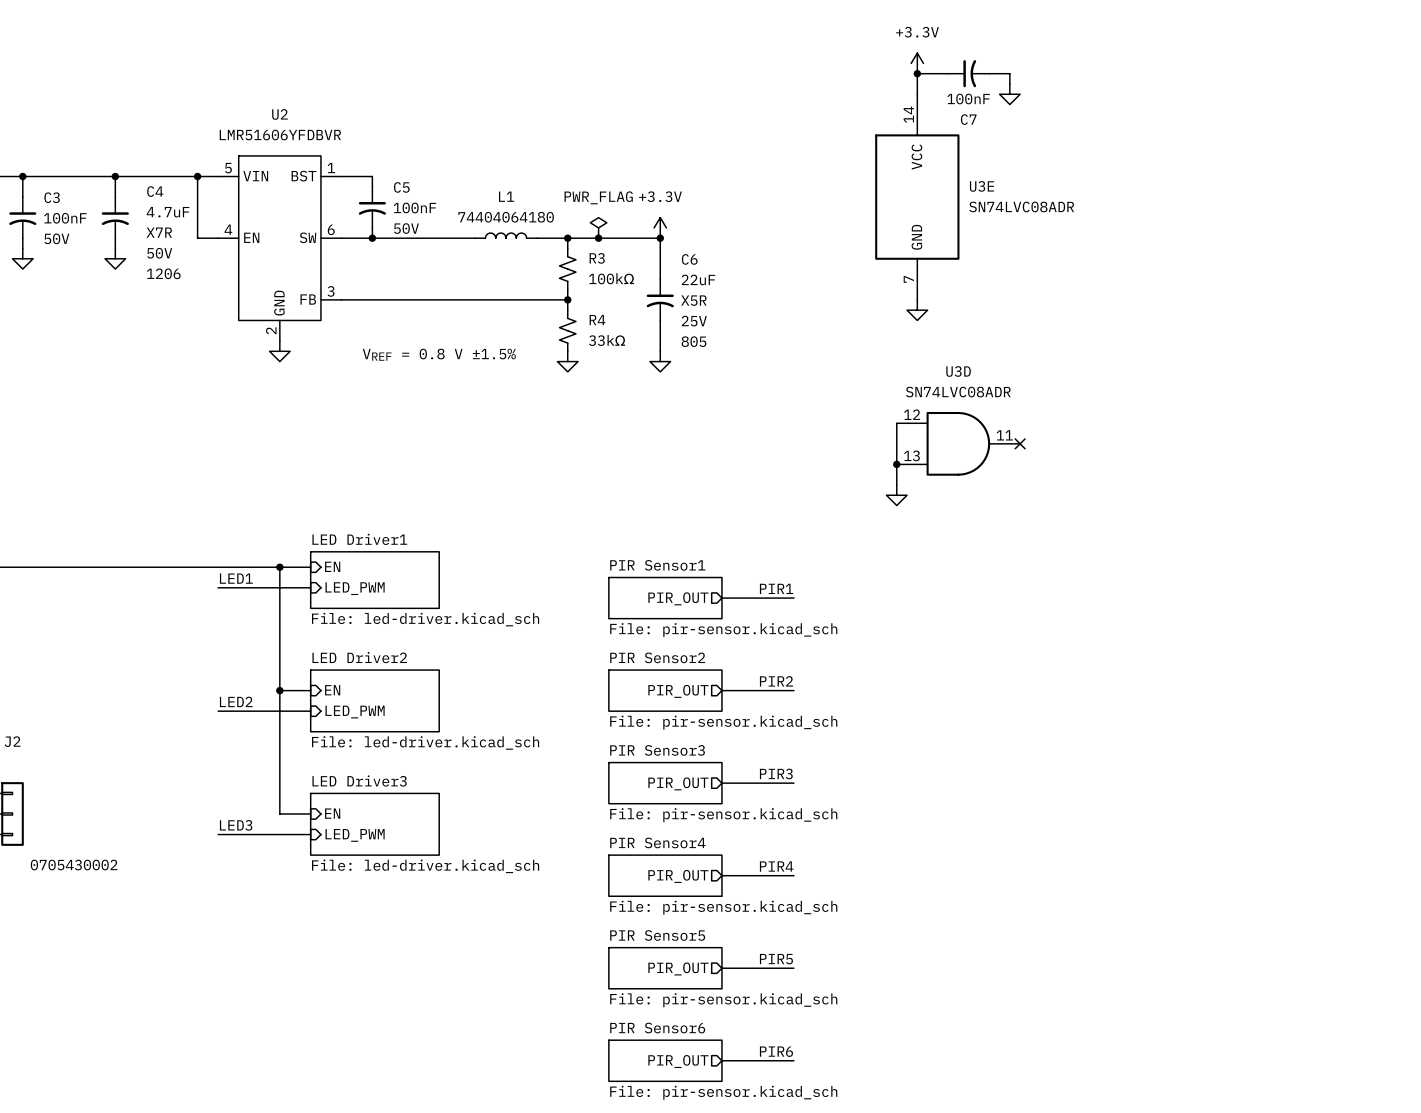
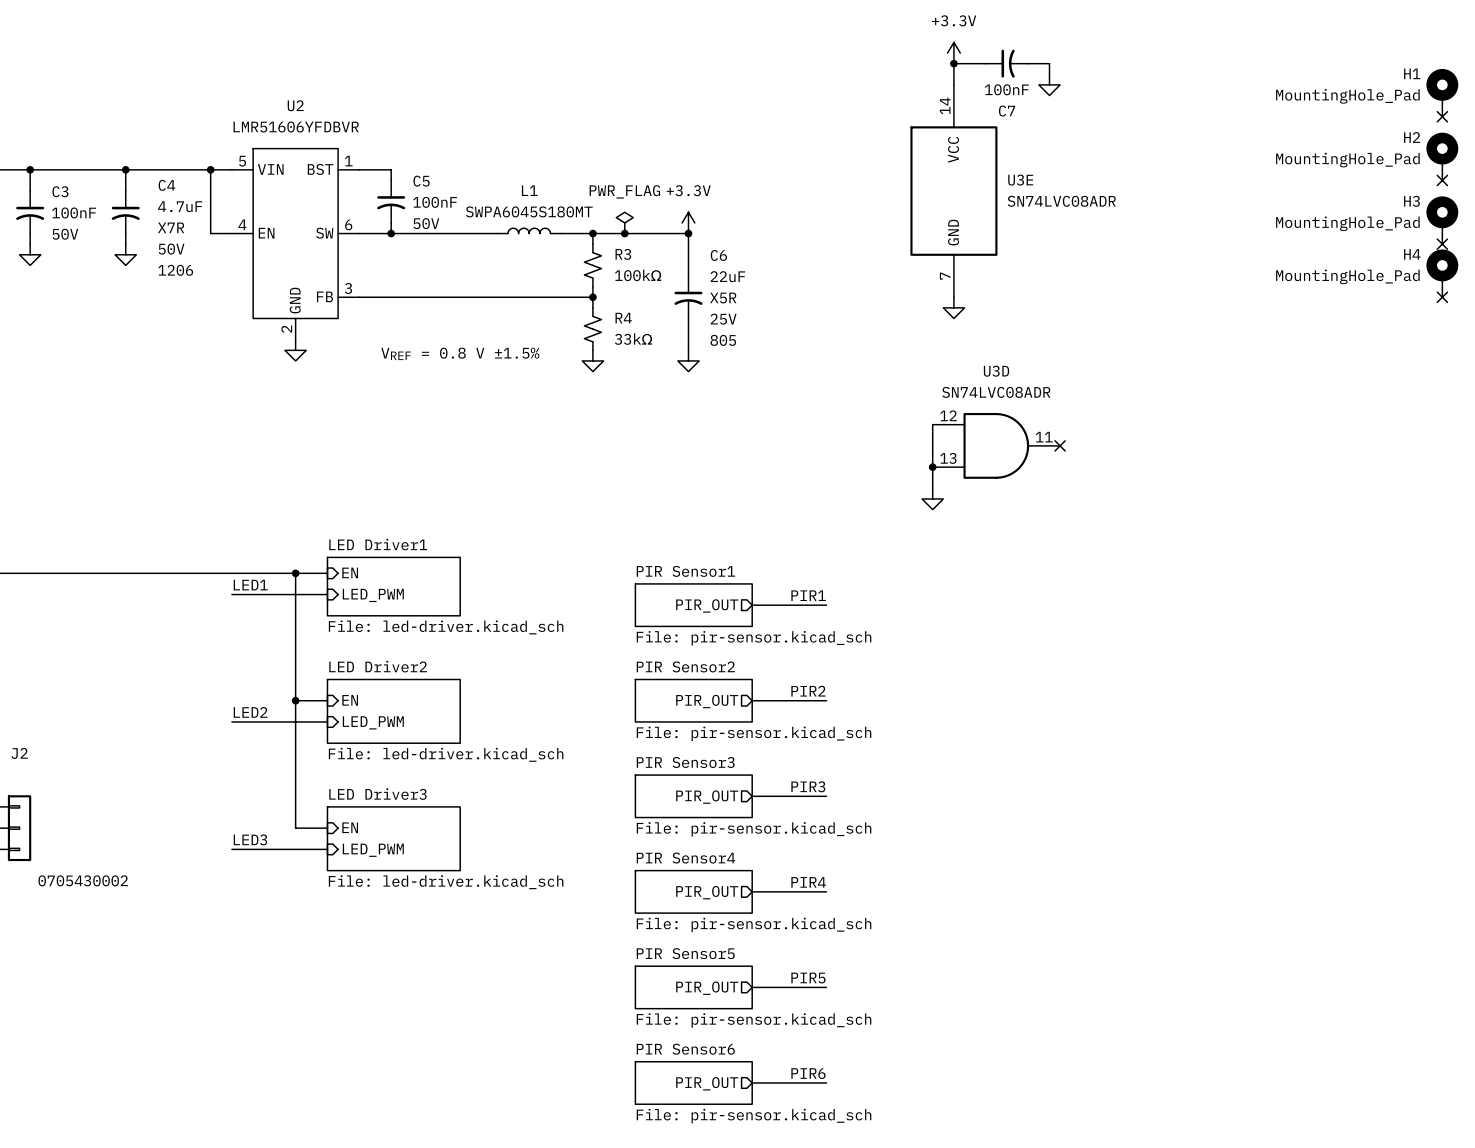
H1: none -> MountingHole_Pad (1442, 92)
no-connect mark: none -> (1442, 116)
H2: none -> MountingHole_Pad (1442, 156)
no-connect mark: none -> (1442, 180)
L1 value: 74404064180 (506, 217) -> SWPA6045S180MT (529, 211)
H3: none -> MountingHole_Pad (1442, 220)
no-connect mark: none -> (1442, 244)
H4: none -> MountingHole_Pad (1442, 273)
no-connect mark: none -> (1442, 297)

